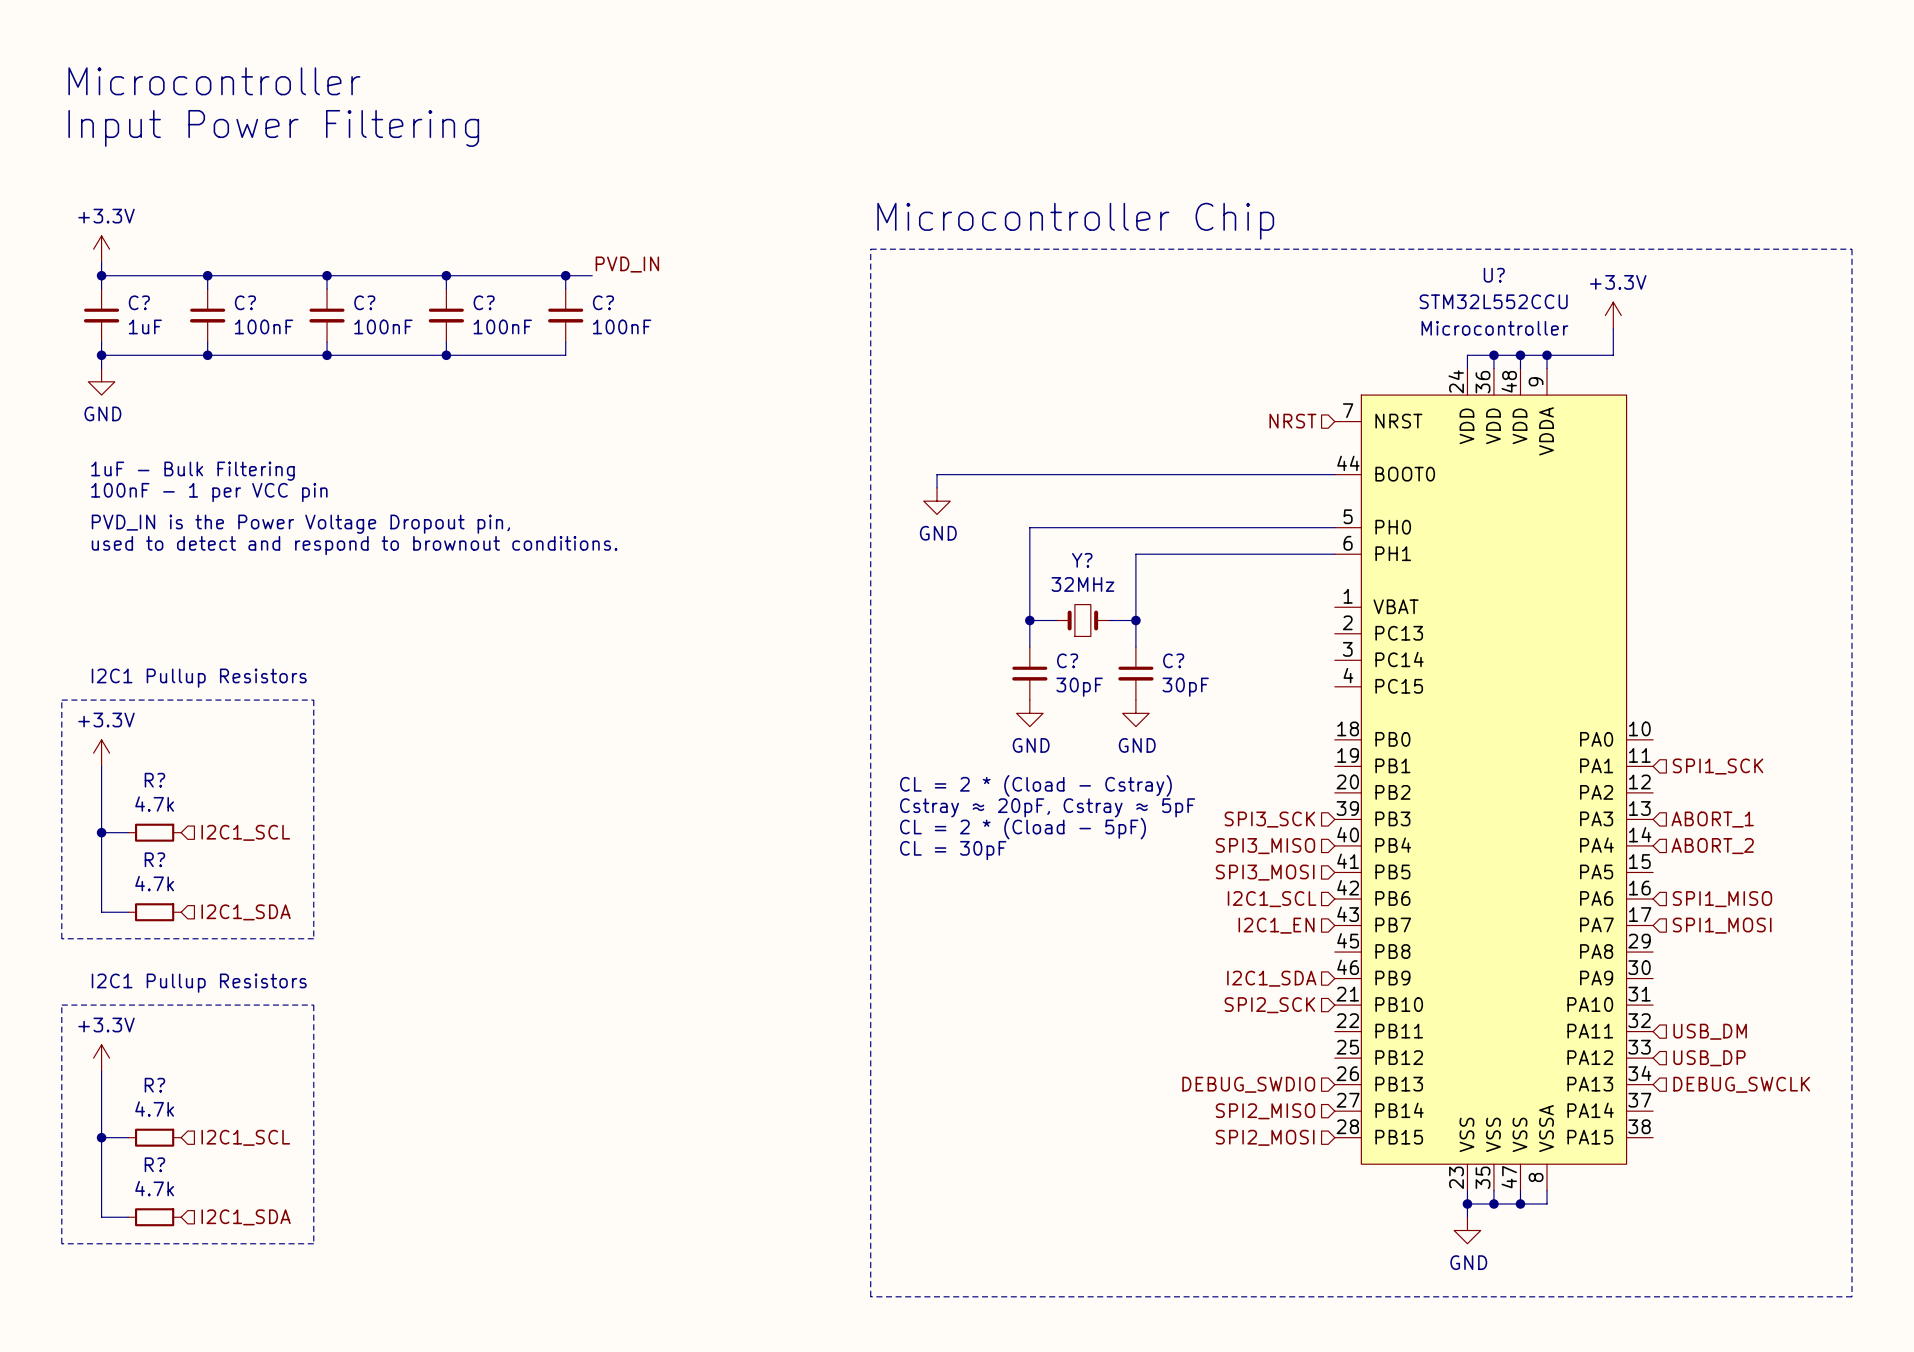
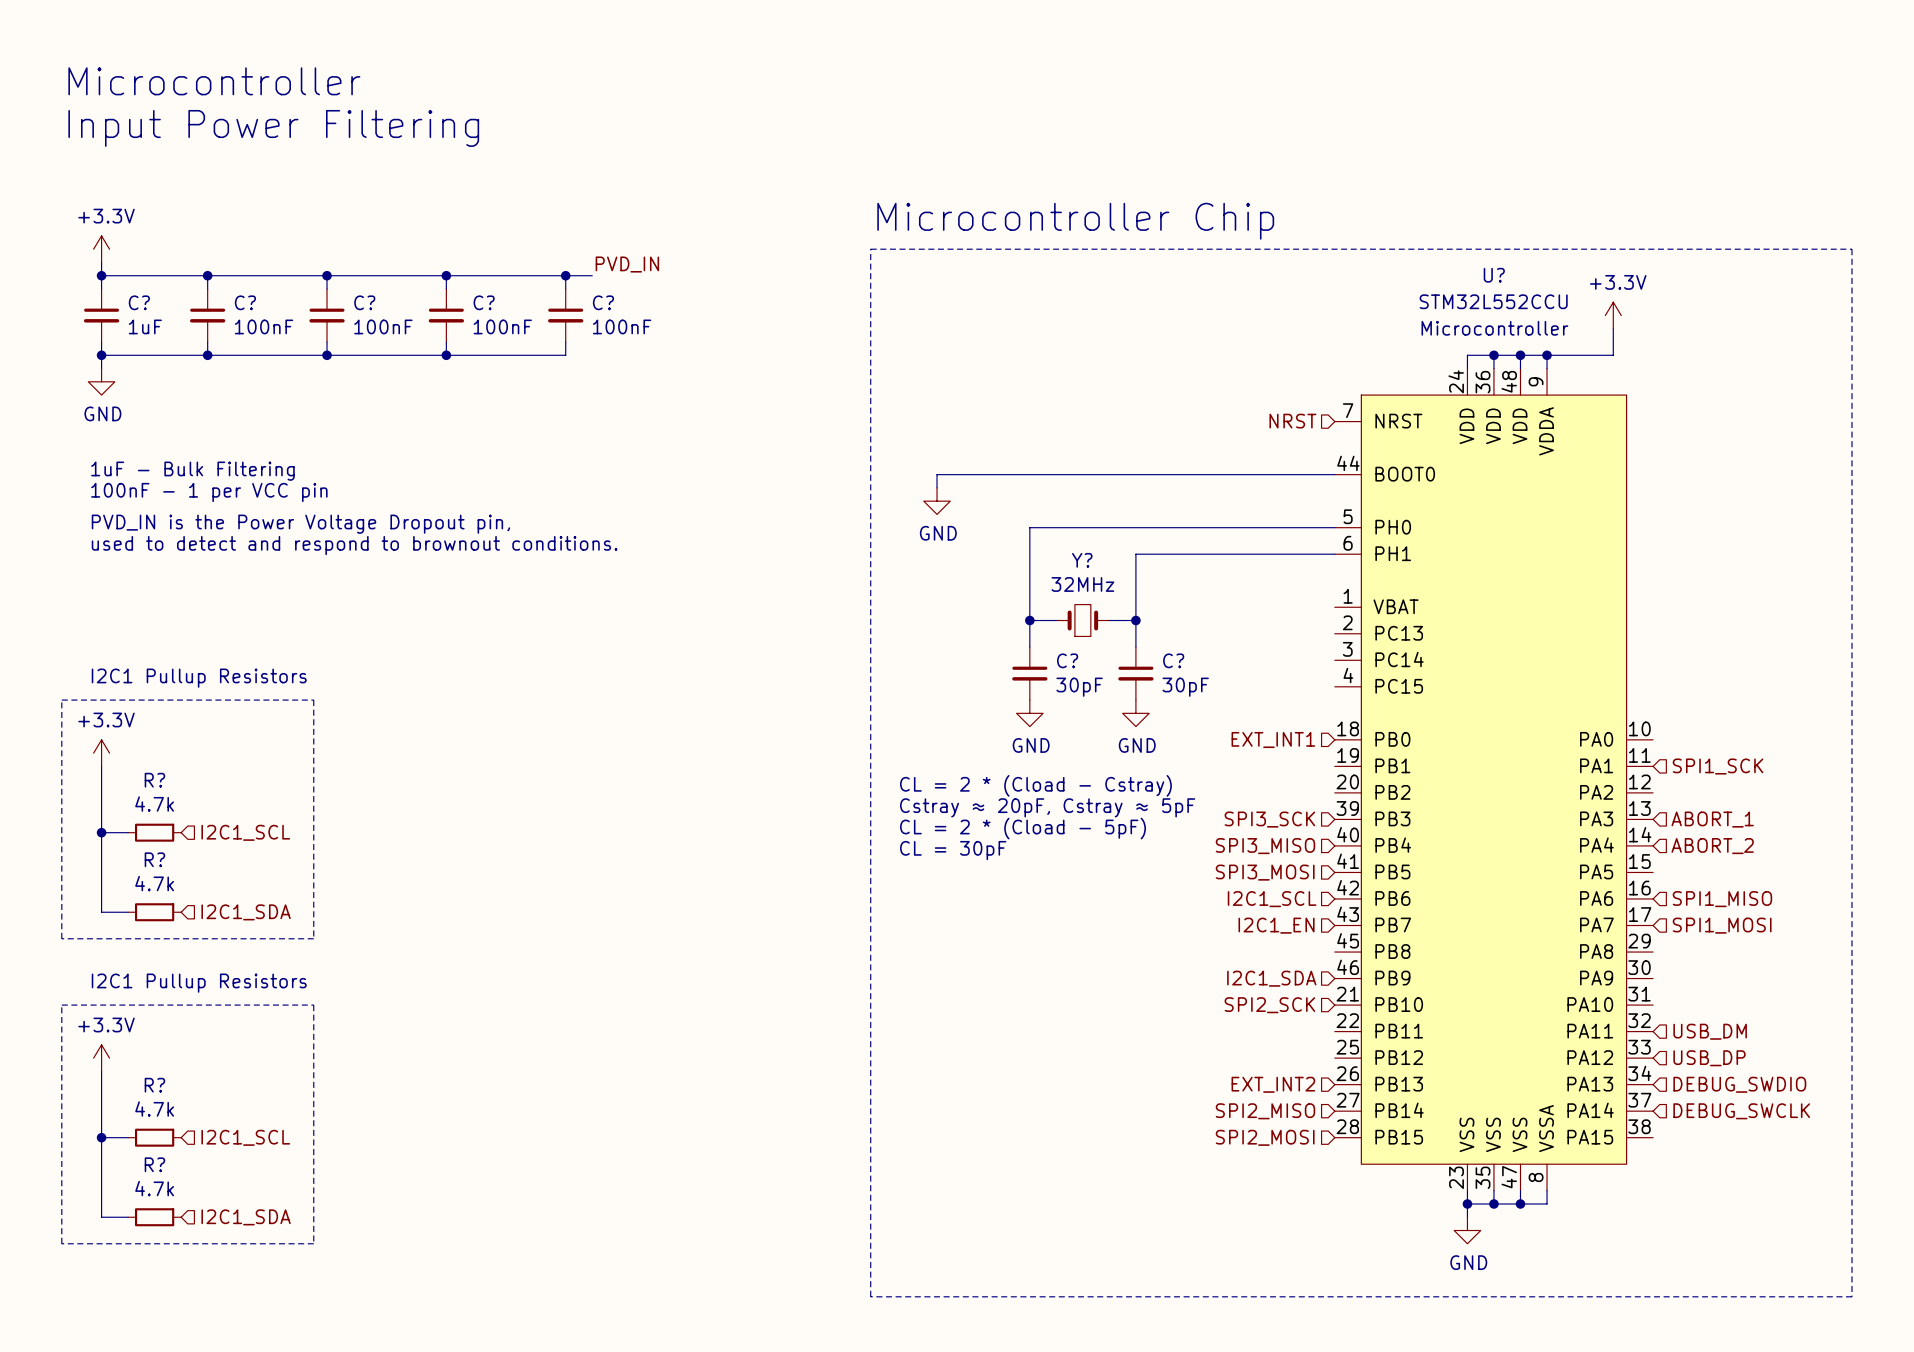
hierarchical label: none -> EXT_INT1 (1273, 739)
hierarchical label: DEBUG_SWDIO (1248, 1084) -> EXT_INT2 (1273, 1084)
hierarchical label: DEBUG_SWCLK (1741, 1084) -> DEBUG_SWDIO (1739, 1084)
hierarchical label: none -> DEBUG_SWCLK (1741, 1111)

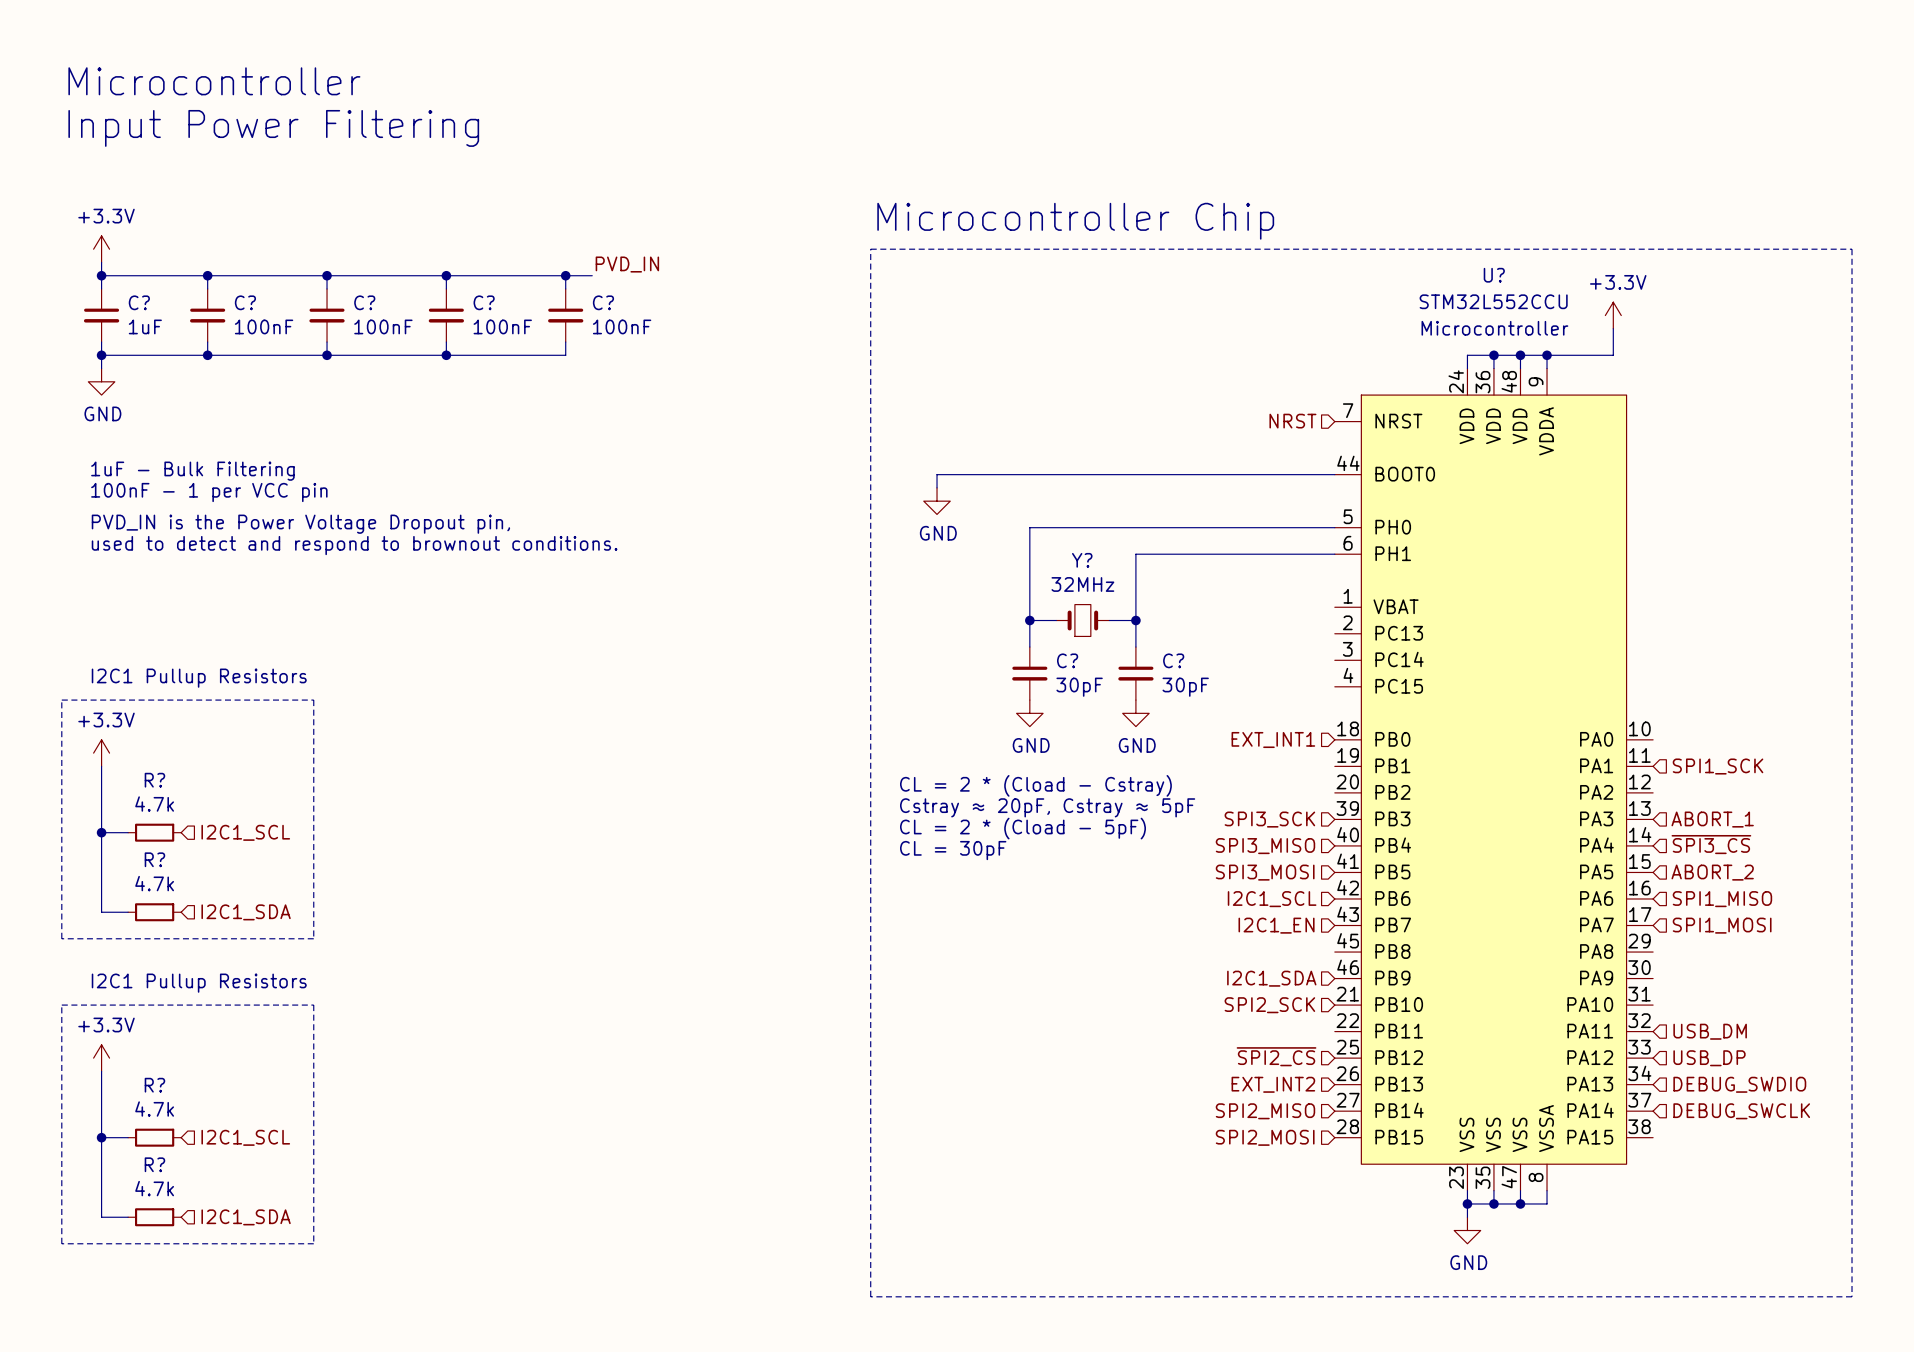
hierarchical label: ABORT_2 (1712, 846) -> ~{SPI3_CS} (1711, 844)
hierarchical label: none -> ABORT_2 (1712, 872)
hierarchical label: none -> ~{SPI2_CS} (1276, 1056)

